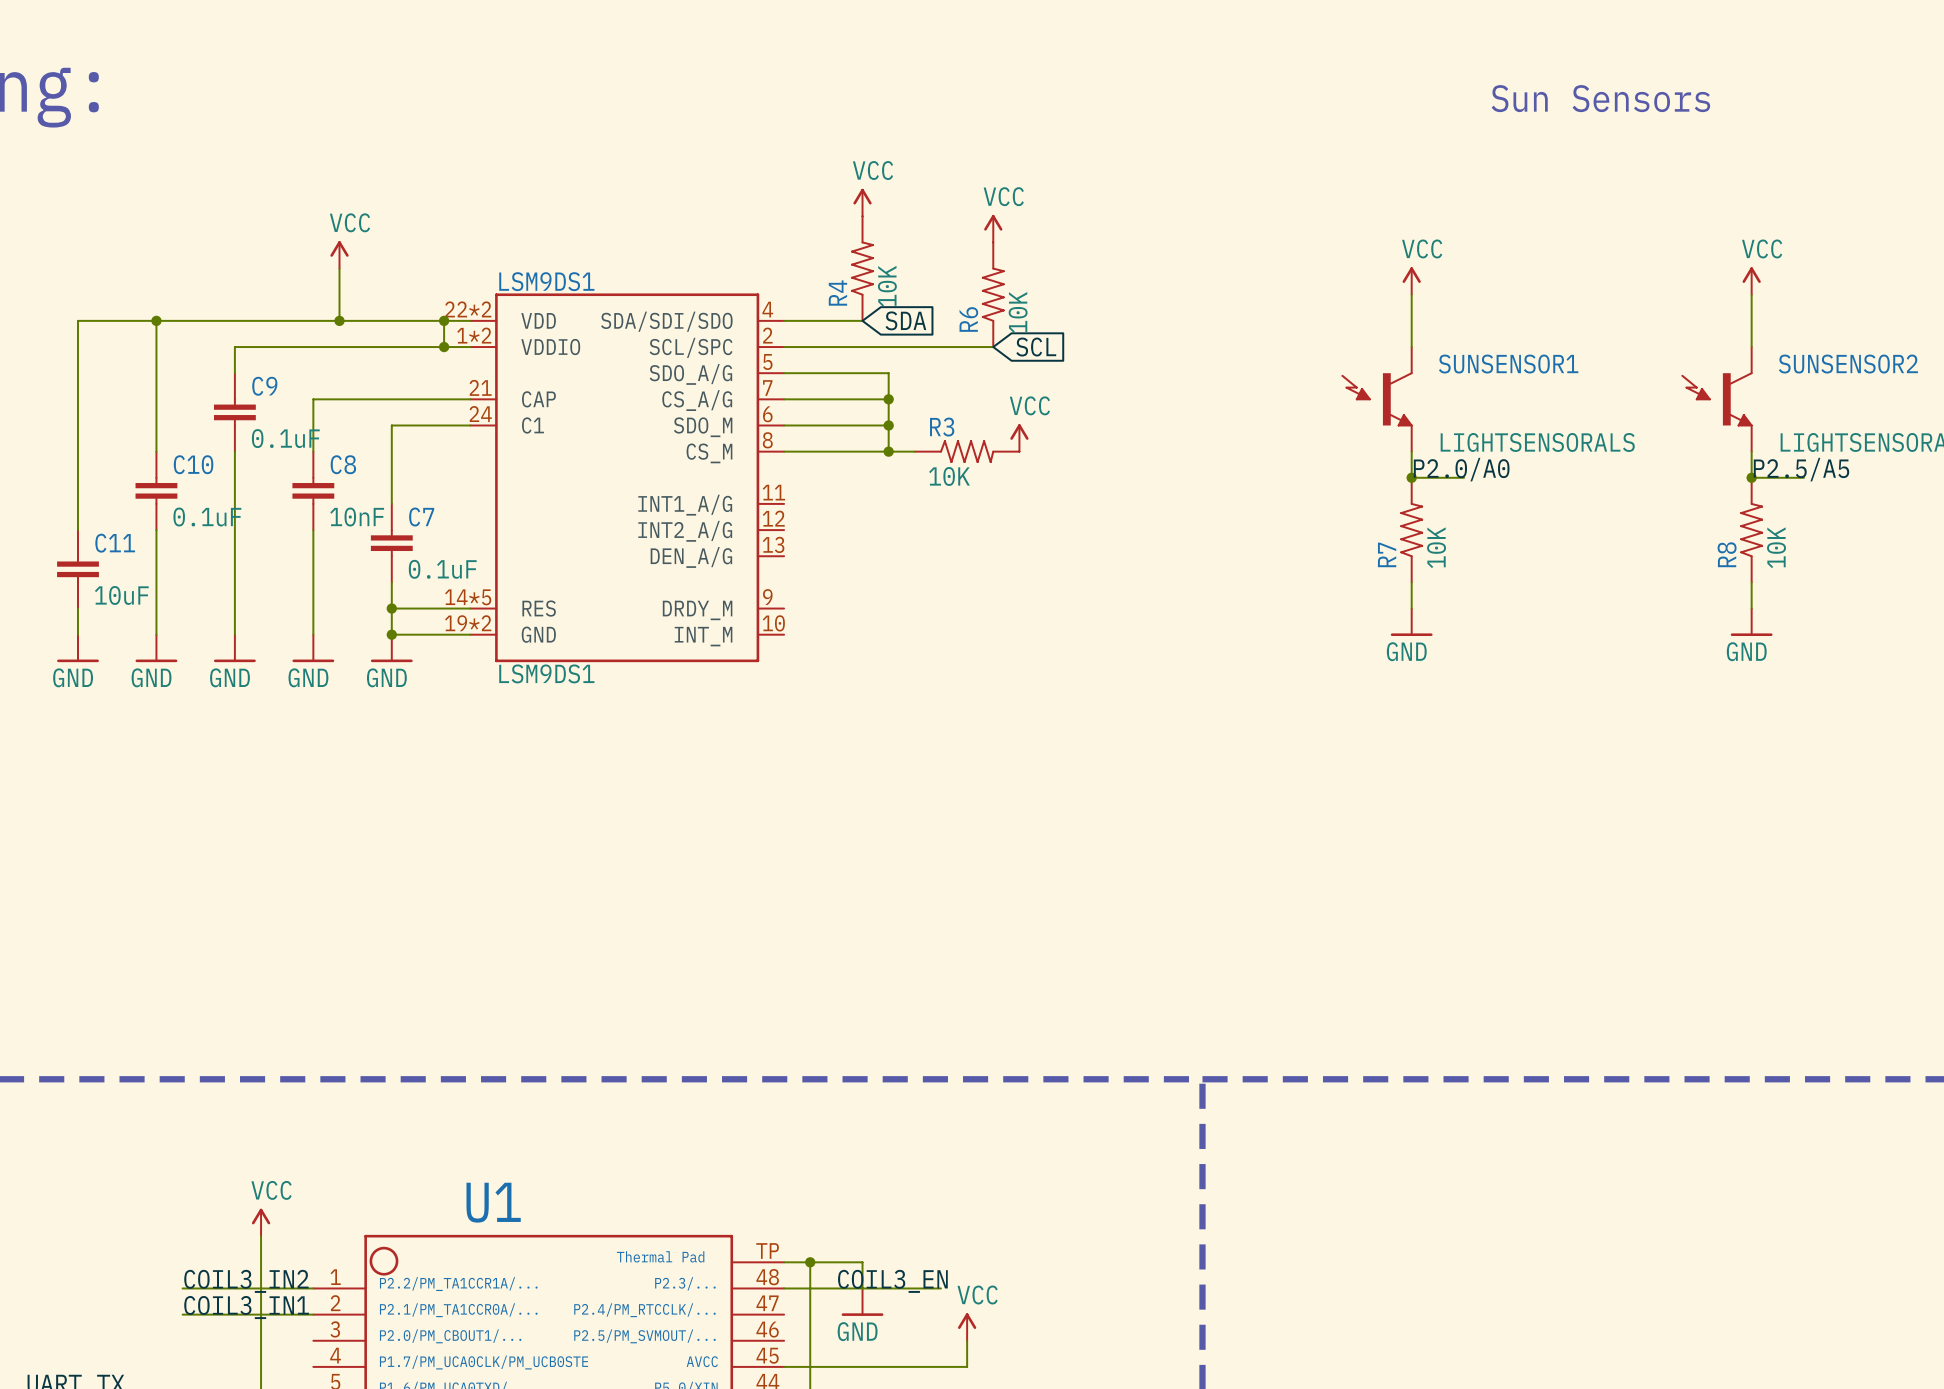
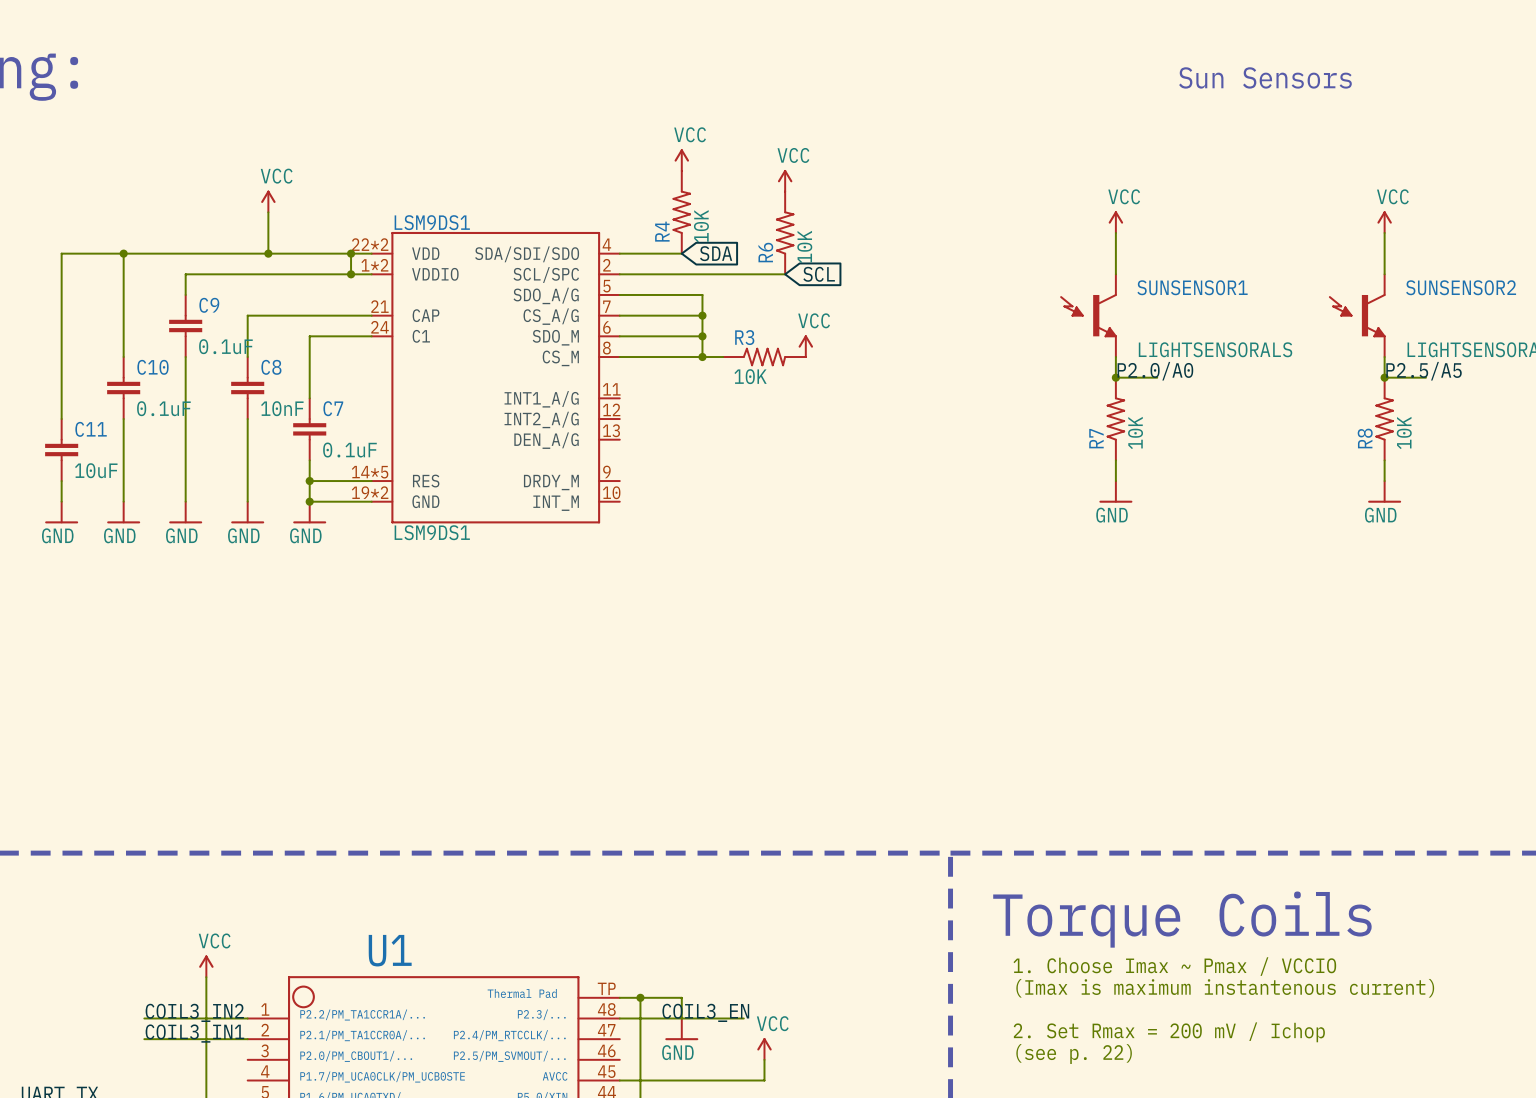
text: none -> Torque Coils (1182, 919)
text: none -> 1. Choose Imax ~ Pmax / VCCIO (1174, 966)
text: none -> (Imax is maximum instantenous current) (1225, 988)
text: none -> 2. Set Rmax = 200 mV / Ichop (1169, 1032)
text: none -> (see p. 22) (1074, 1054)

